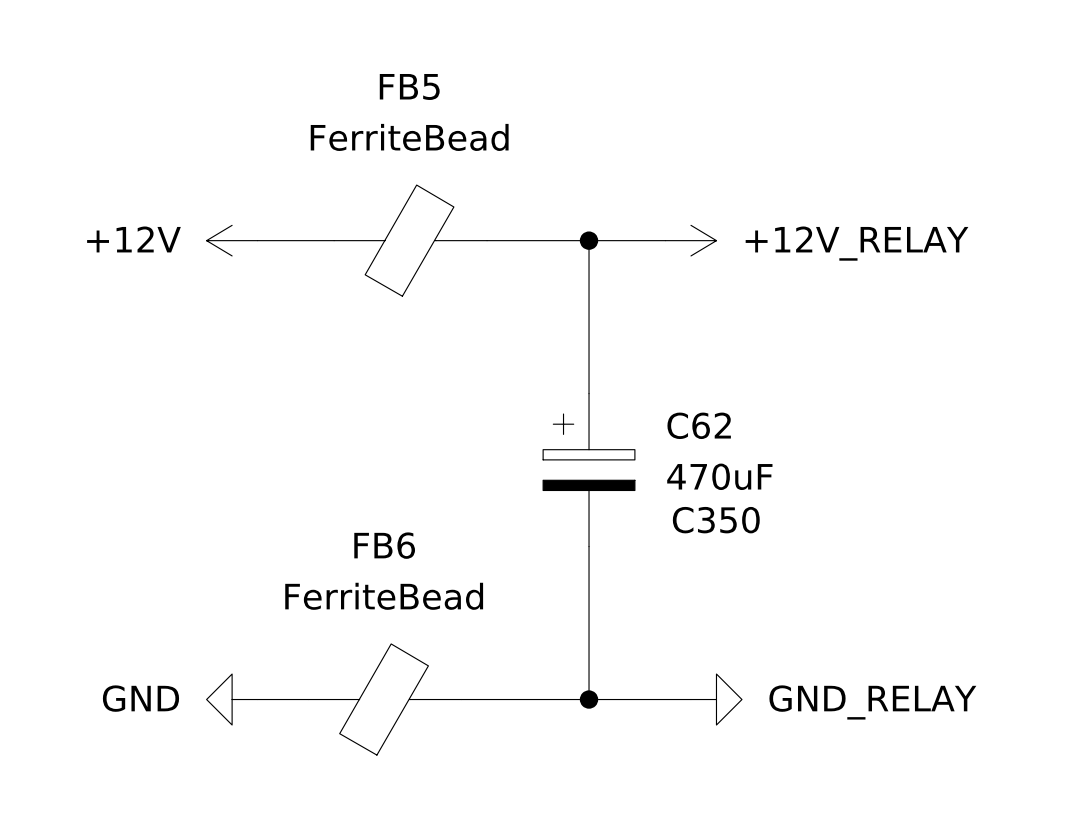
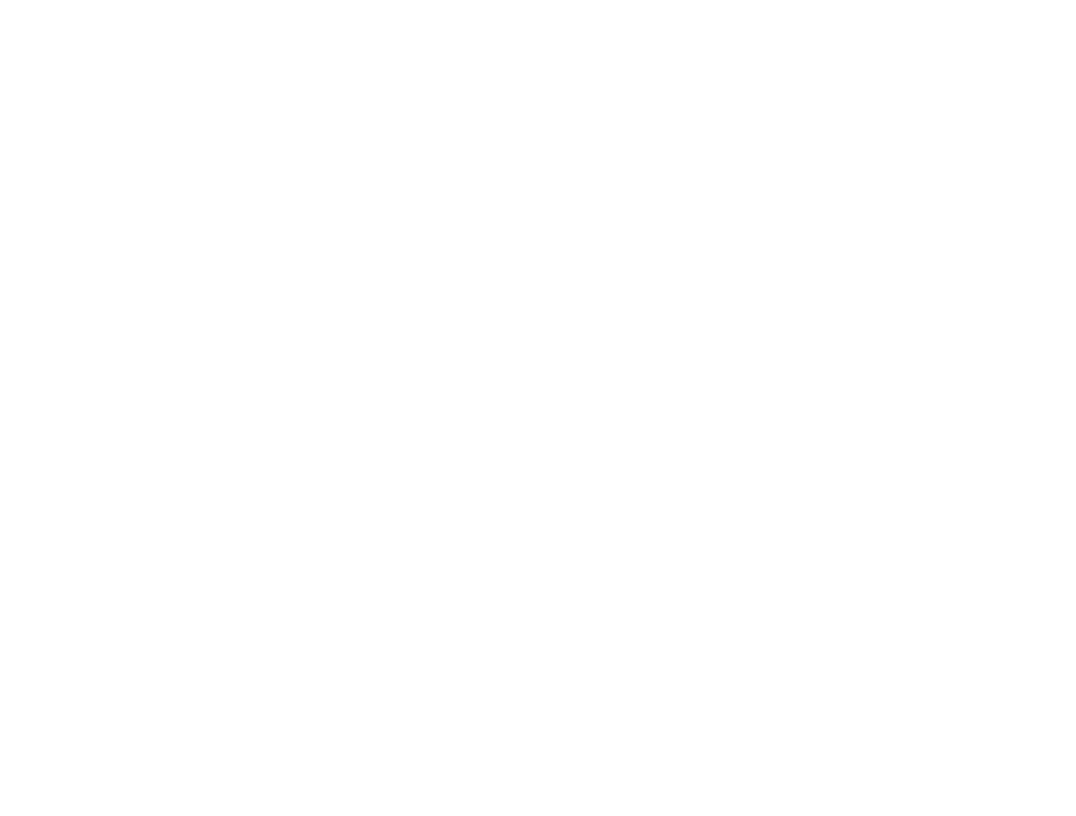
power symbol: +12V (232, 240) -> none
wire: (257, 240) (334, 240) -> none
FB5: FerriteBead (410, 240) -> none
wire: (487, 240) (665, 240) -> none
wire: (589, 240) (589, 393) -> none
junction: (589, 240) -> none
power symbol: +12V_RELAY (690, 240) -> none
C62: 470uF (589, 470) -> none
wire: (589, 546) (589, 699) -> none
power symbol: GND (232, 699) -> none
wire: (257, 699) (308, 699) -> none
FB6: FerriteBead (385, 699) -> none
wire: (461, 699) (690, 699) -> none
junction: (589, 699) -> none
power symbol: GND_RELAY (716, 699) -> none

